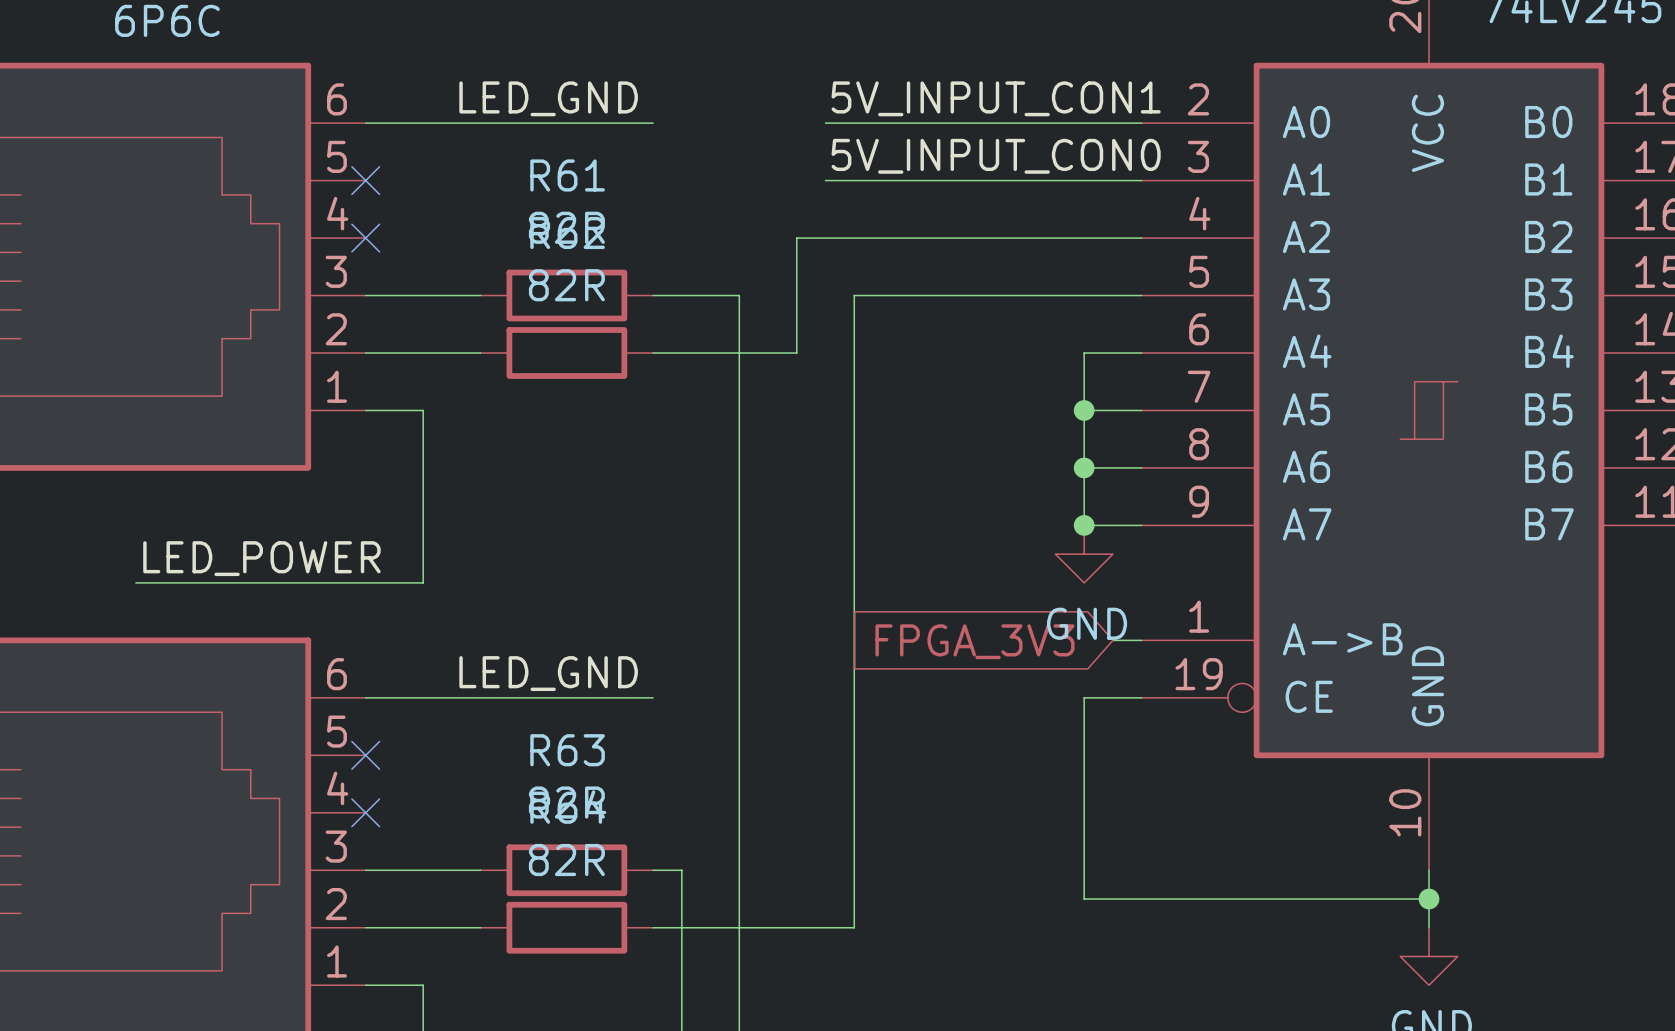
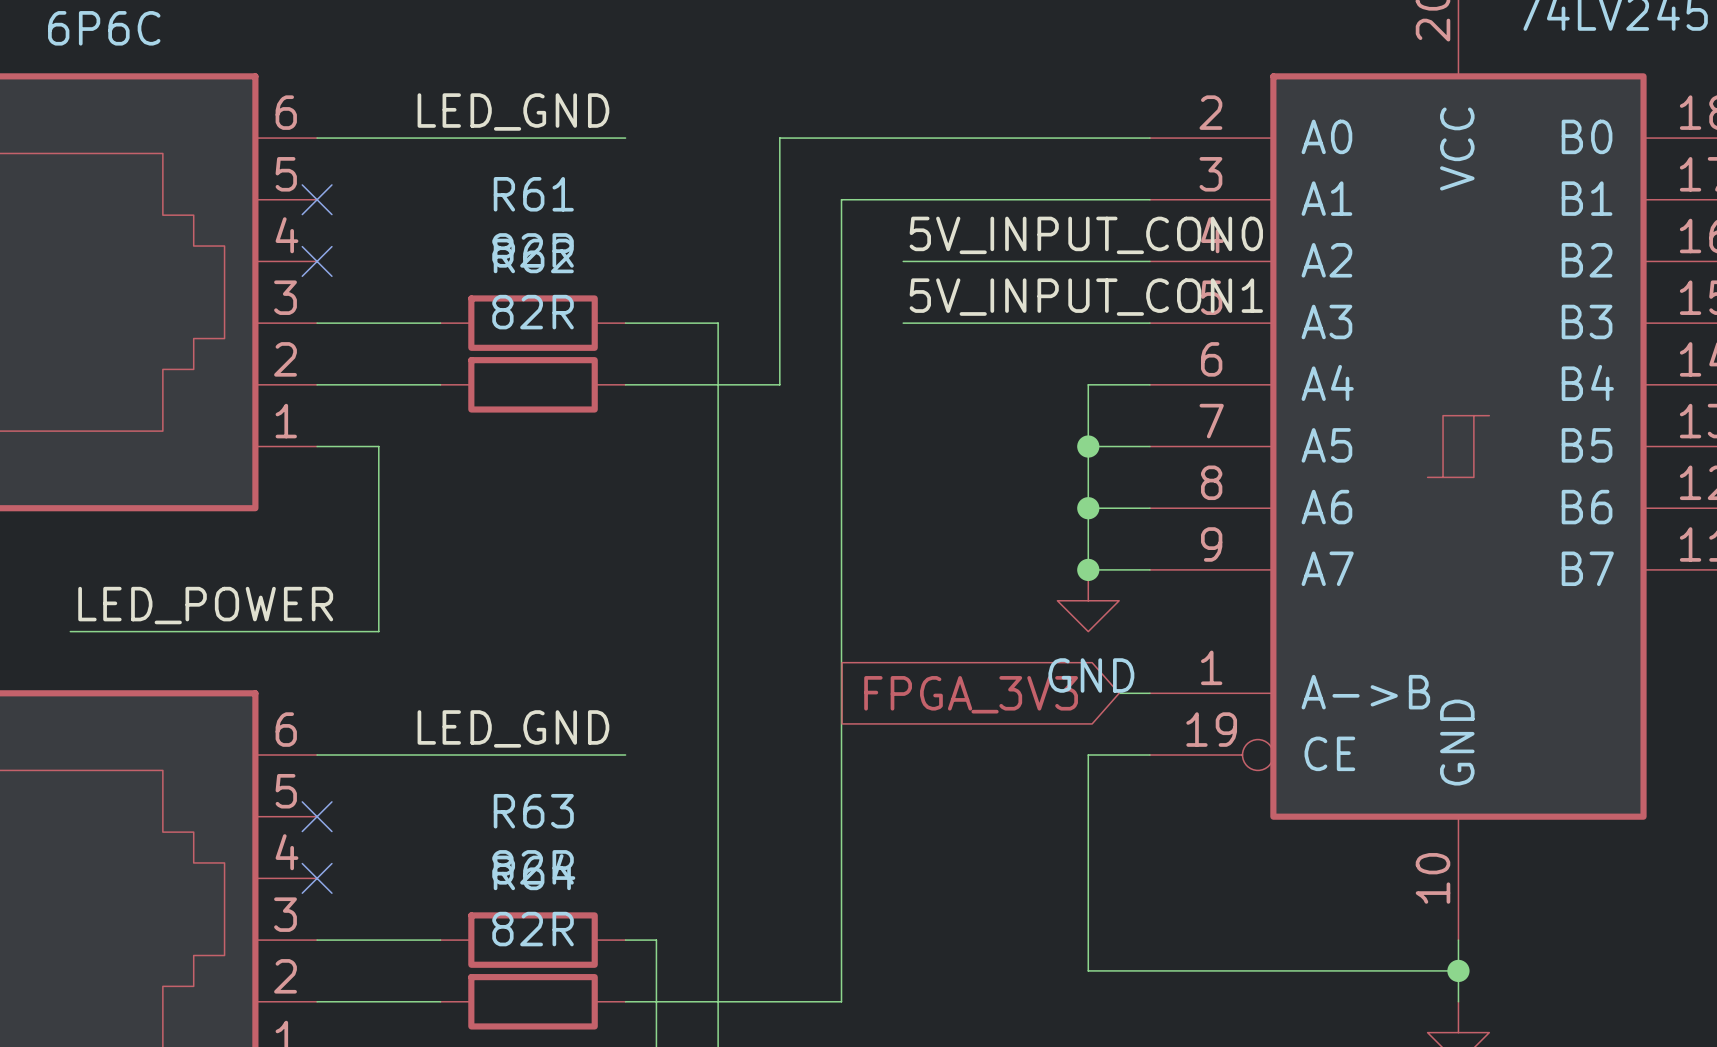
label position: 5V_INPUT_CON1 (996, 98) -> 5V_INPUT_CON1 (1086, 297)
label position: 5V_INPUT_CON0 (996, 156) -> 5V_INPUT_CON0 (1086, 235)
wire: (825, 180) (854, 180) -> (841, 323) (841, 199)
wire: (796, 238) (911, 238) -> (779, 261) (779, 138) (810, 138)
wire: (854, 295) (911, 295) -> none

